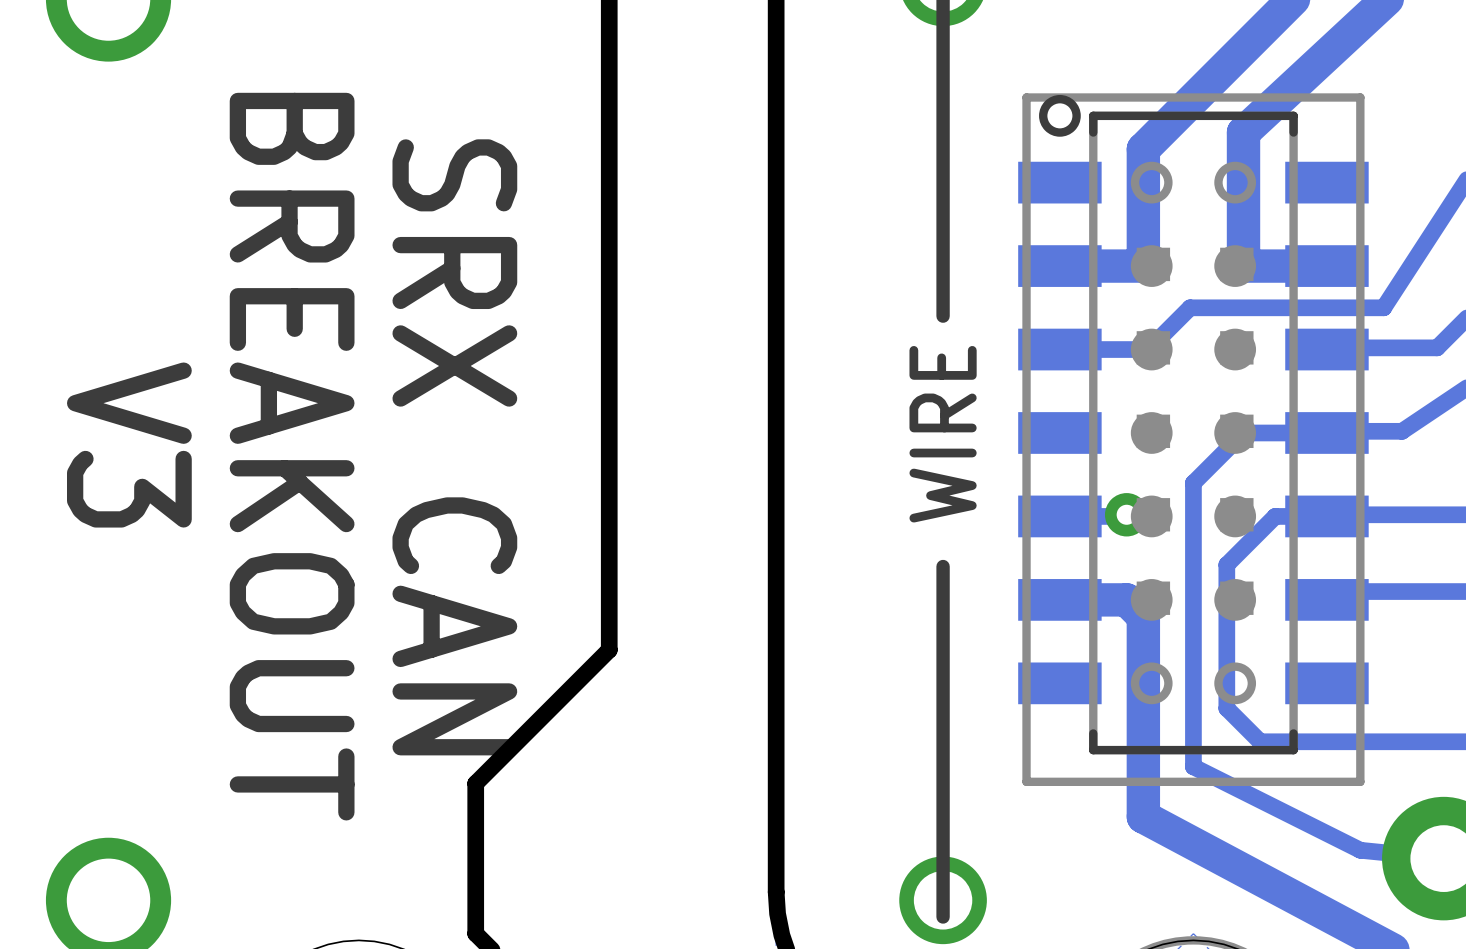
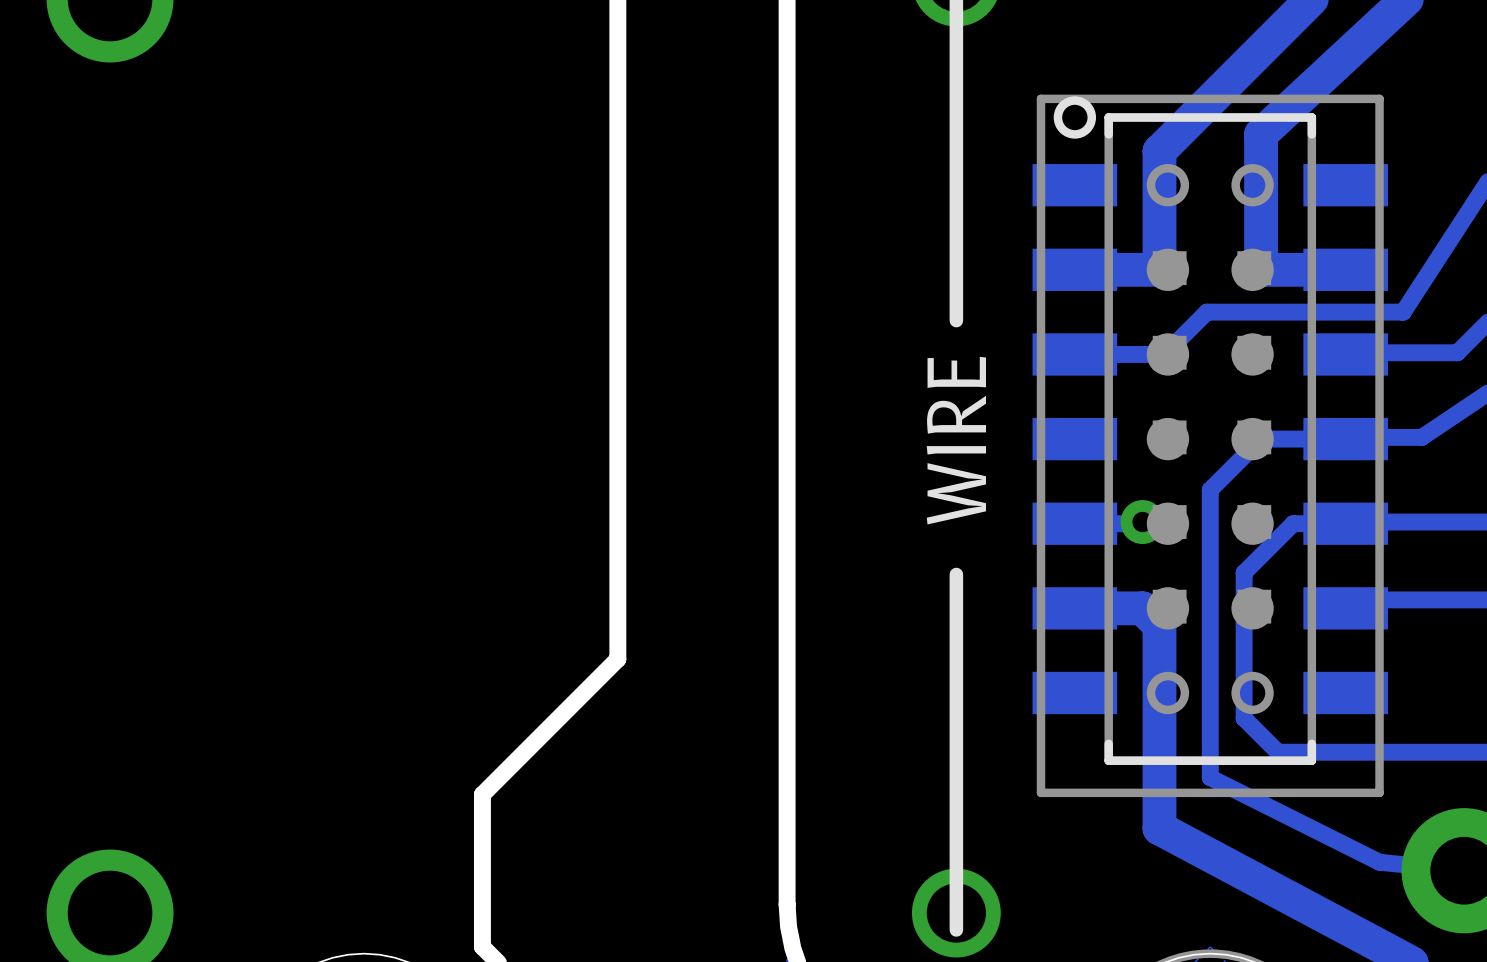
text: V3 (129, 445) -> none
text: SRX CAN (454, 447) -> none
text: BREAKOUT (292, 456) -> none

